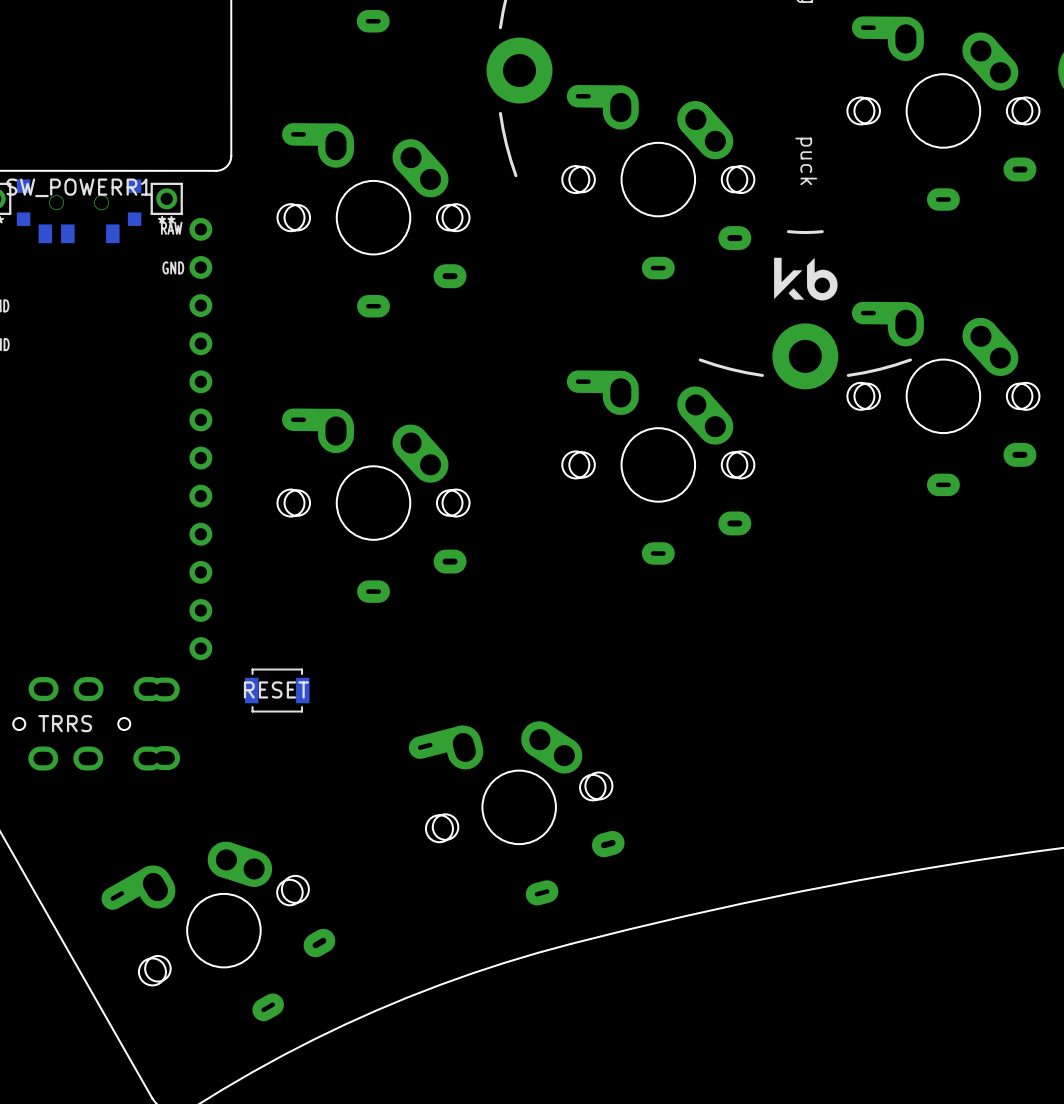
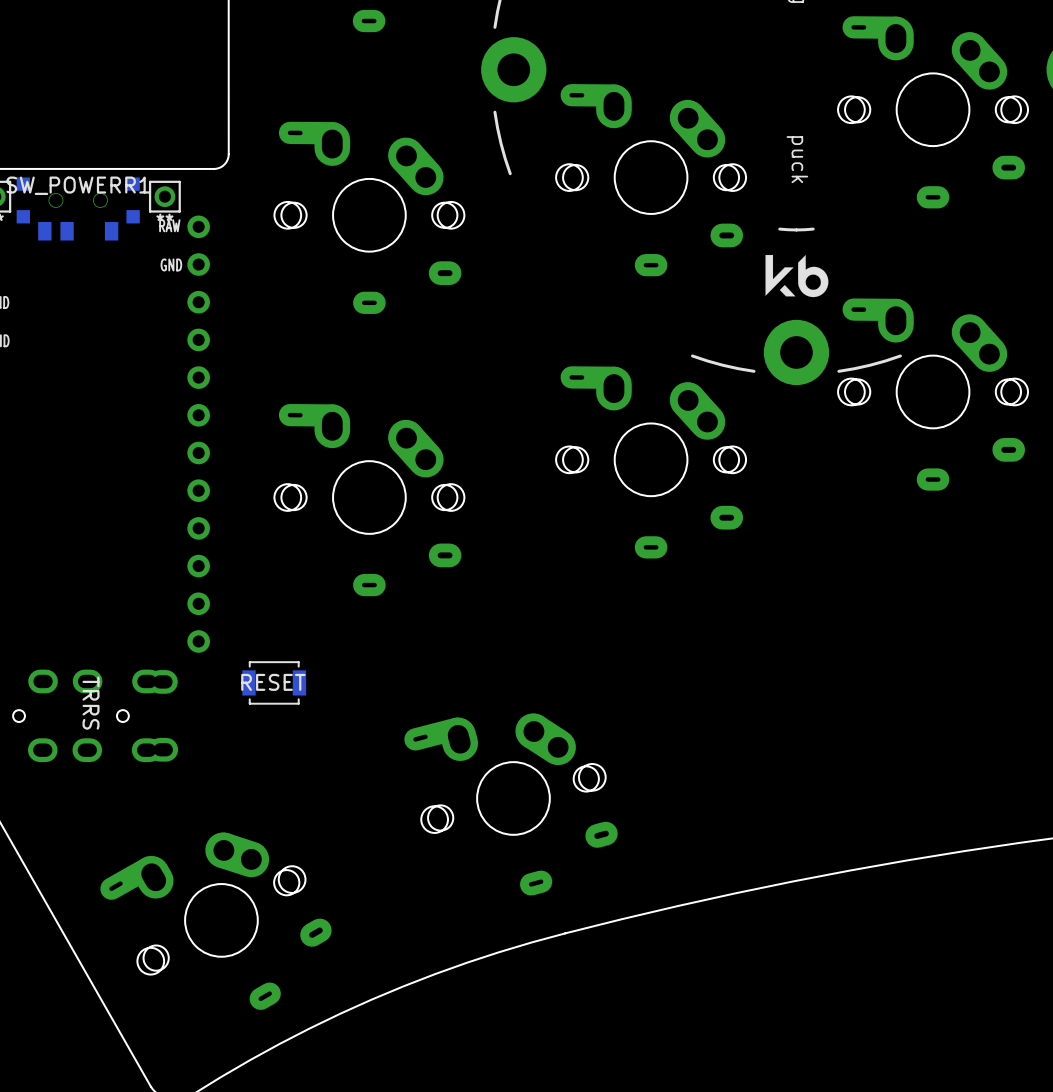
part text rotation: 0° (65, 723) -> 90° clockwise (91, 703)

